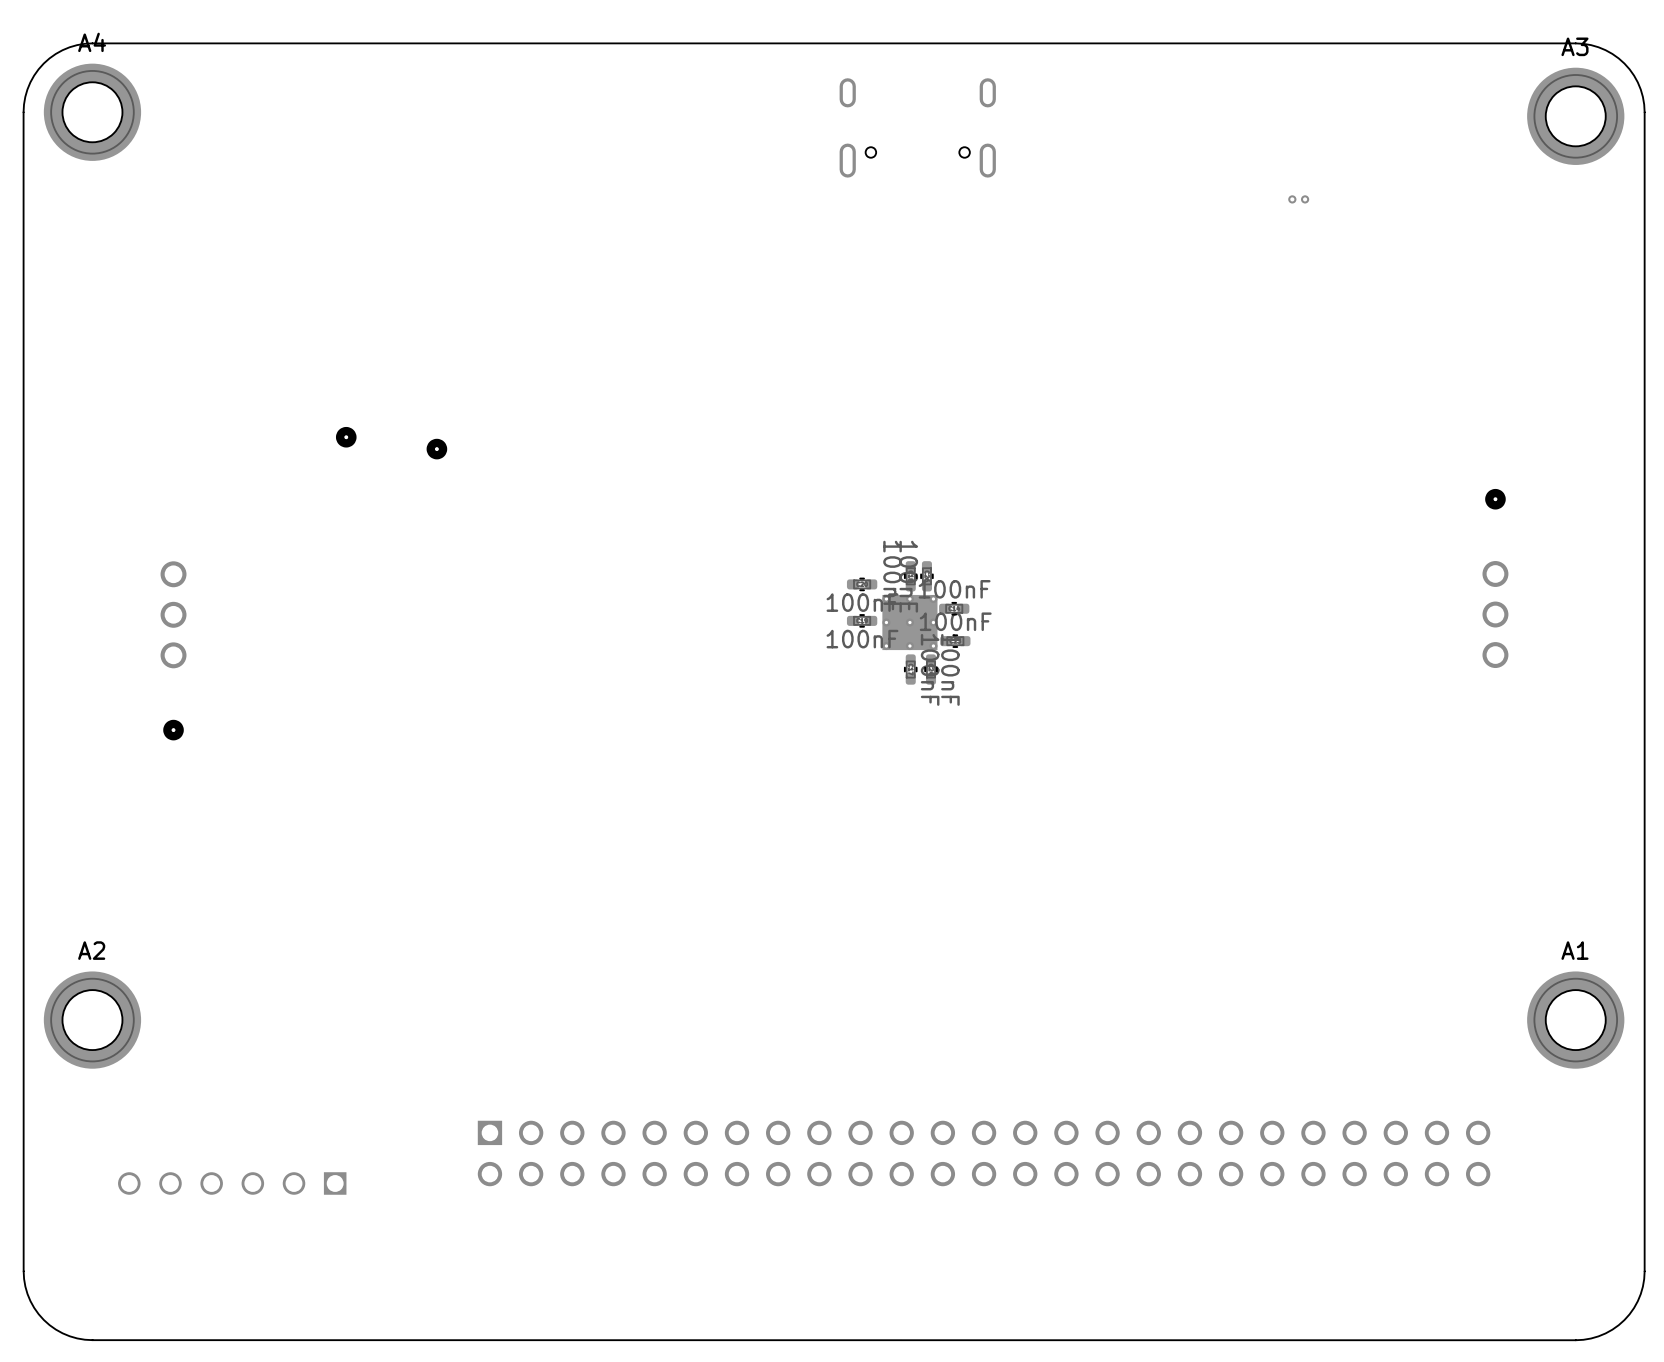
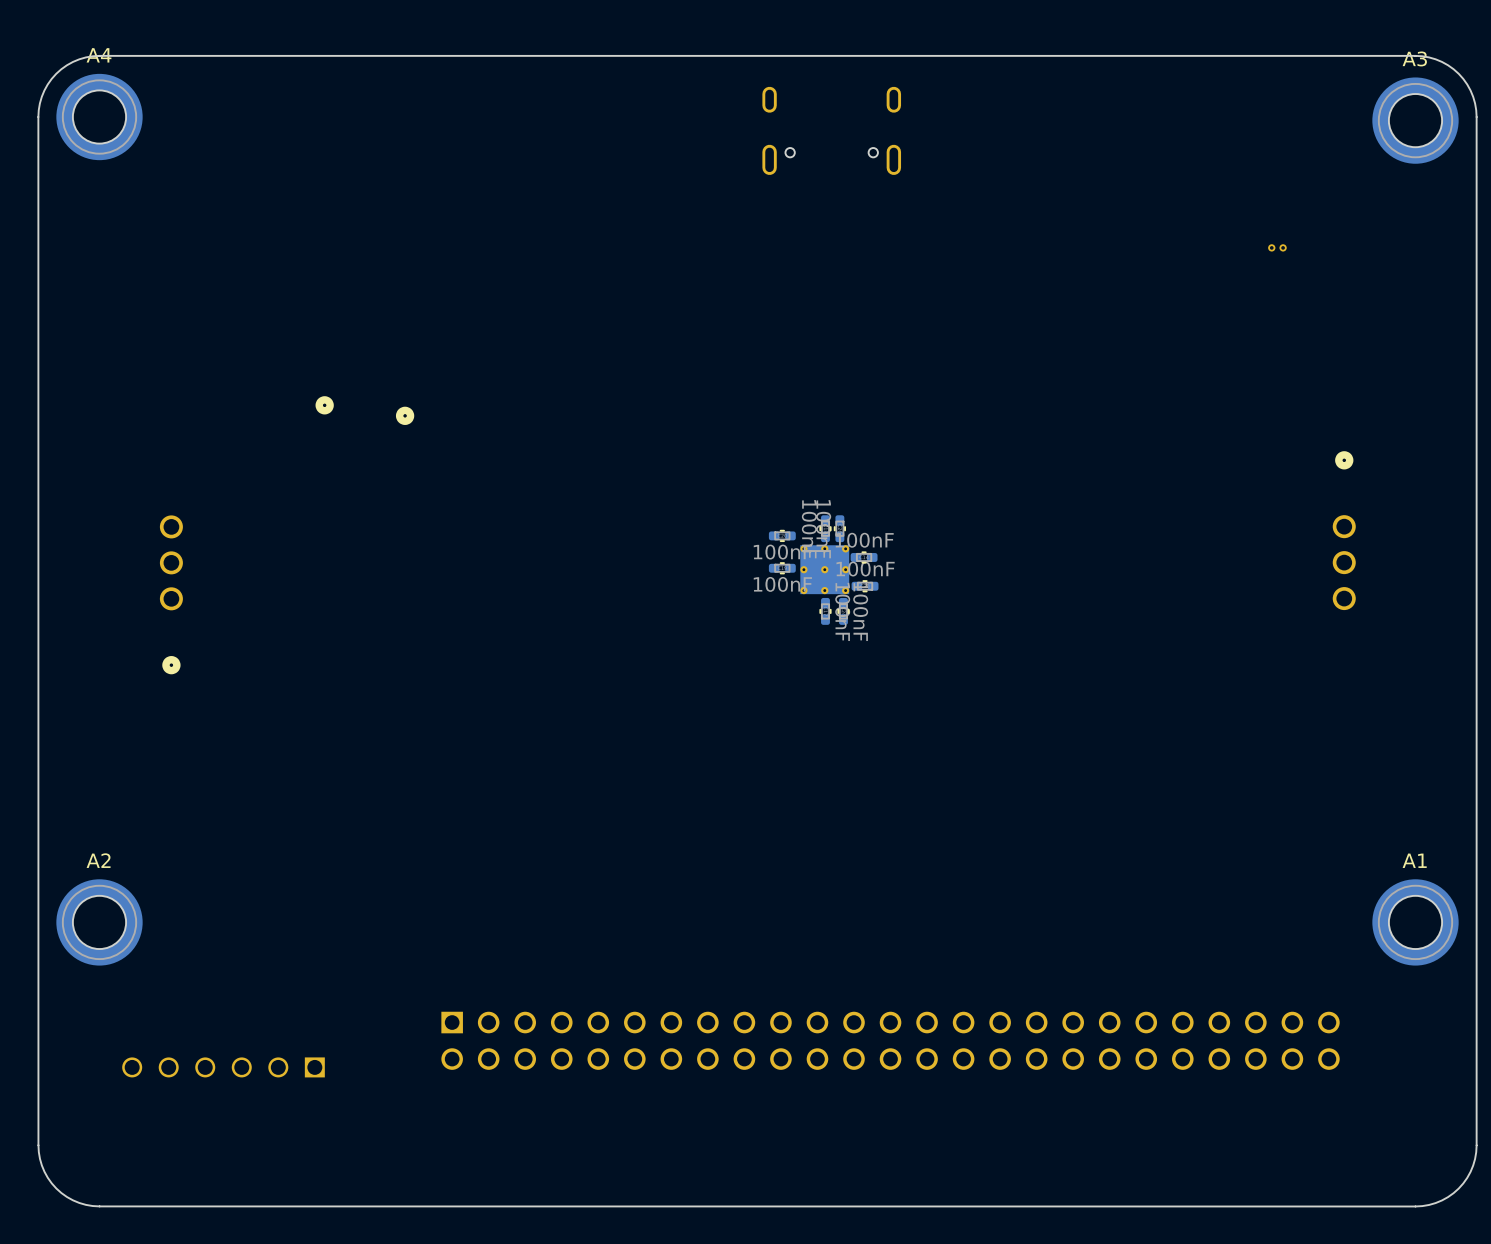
part position: (1298, 199) -> (1277, 247)

